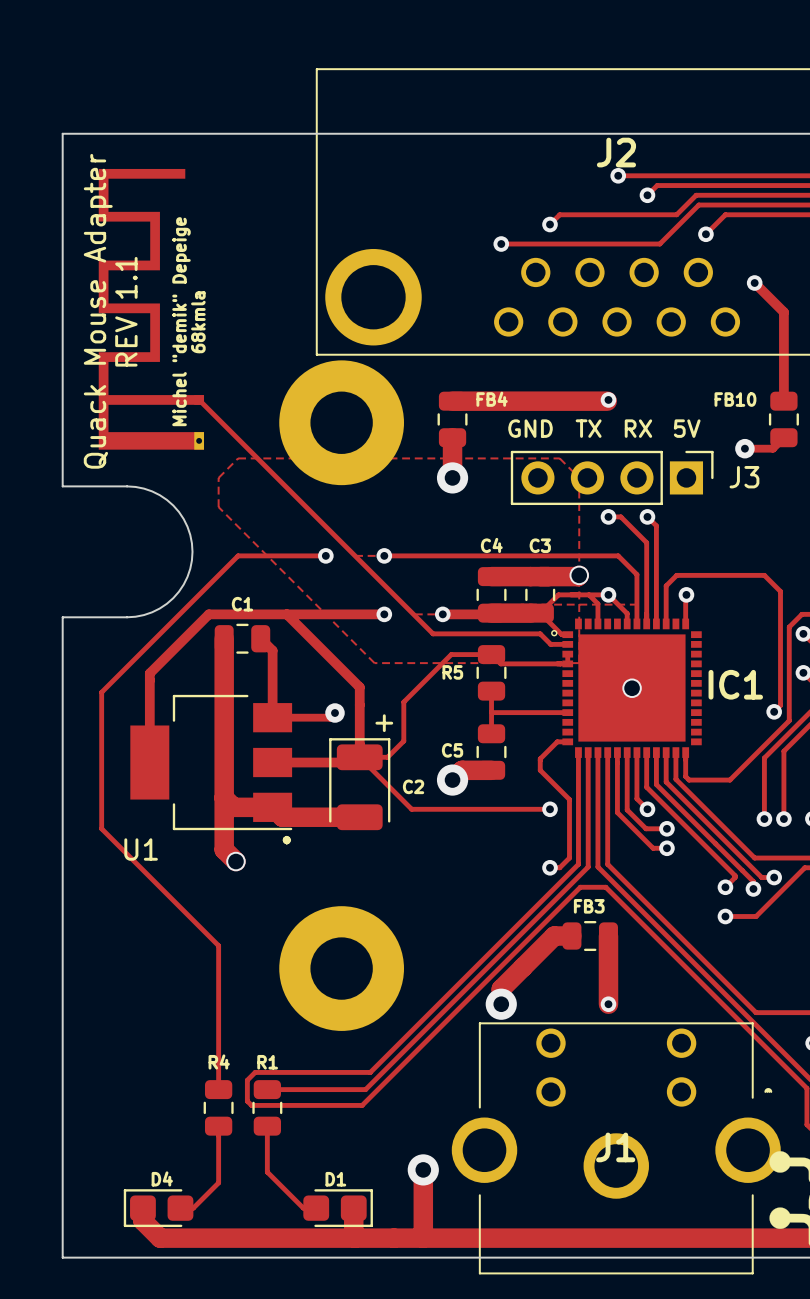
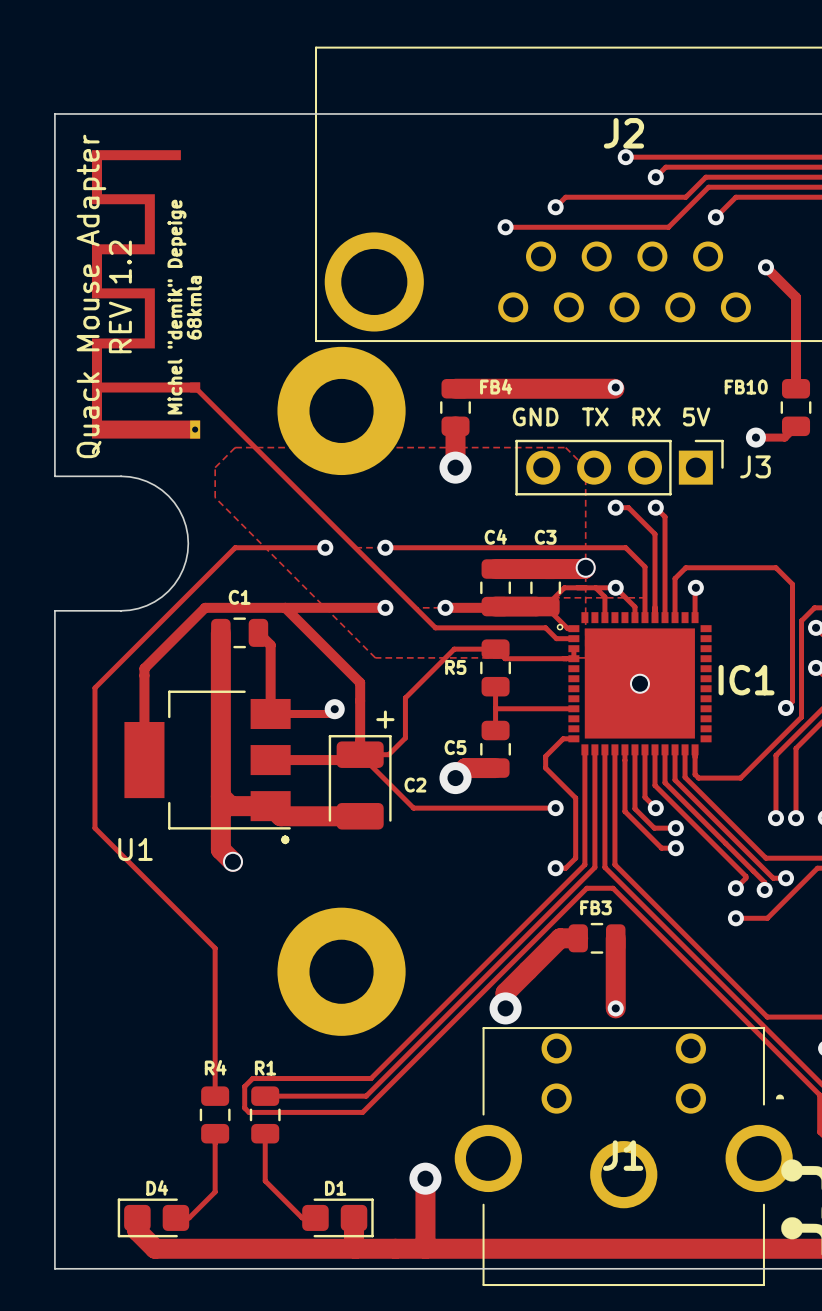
text: REV 1.1 (126, 311) -> REV 1.2 (120, 296)

